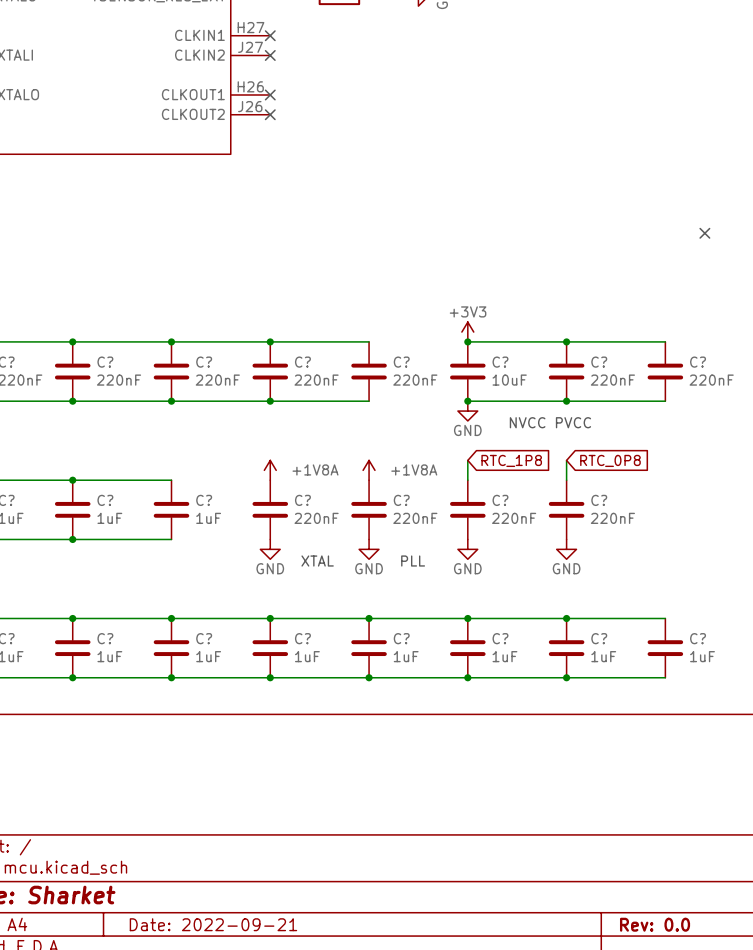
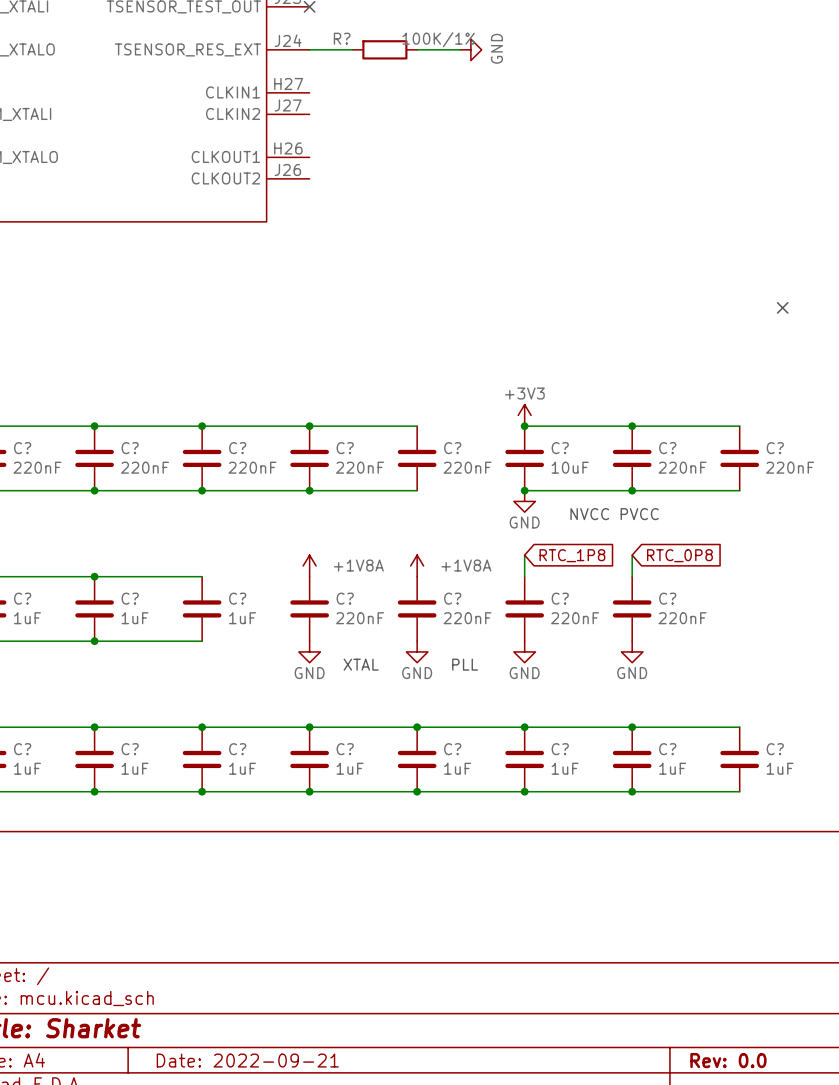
no-connect mark: (270, 35) -> none
no-connect mark: (270, 55) -> none
no-connect mark: (270, 94) -> none
no-connect mark: (270, 114) -> none

